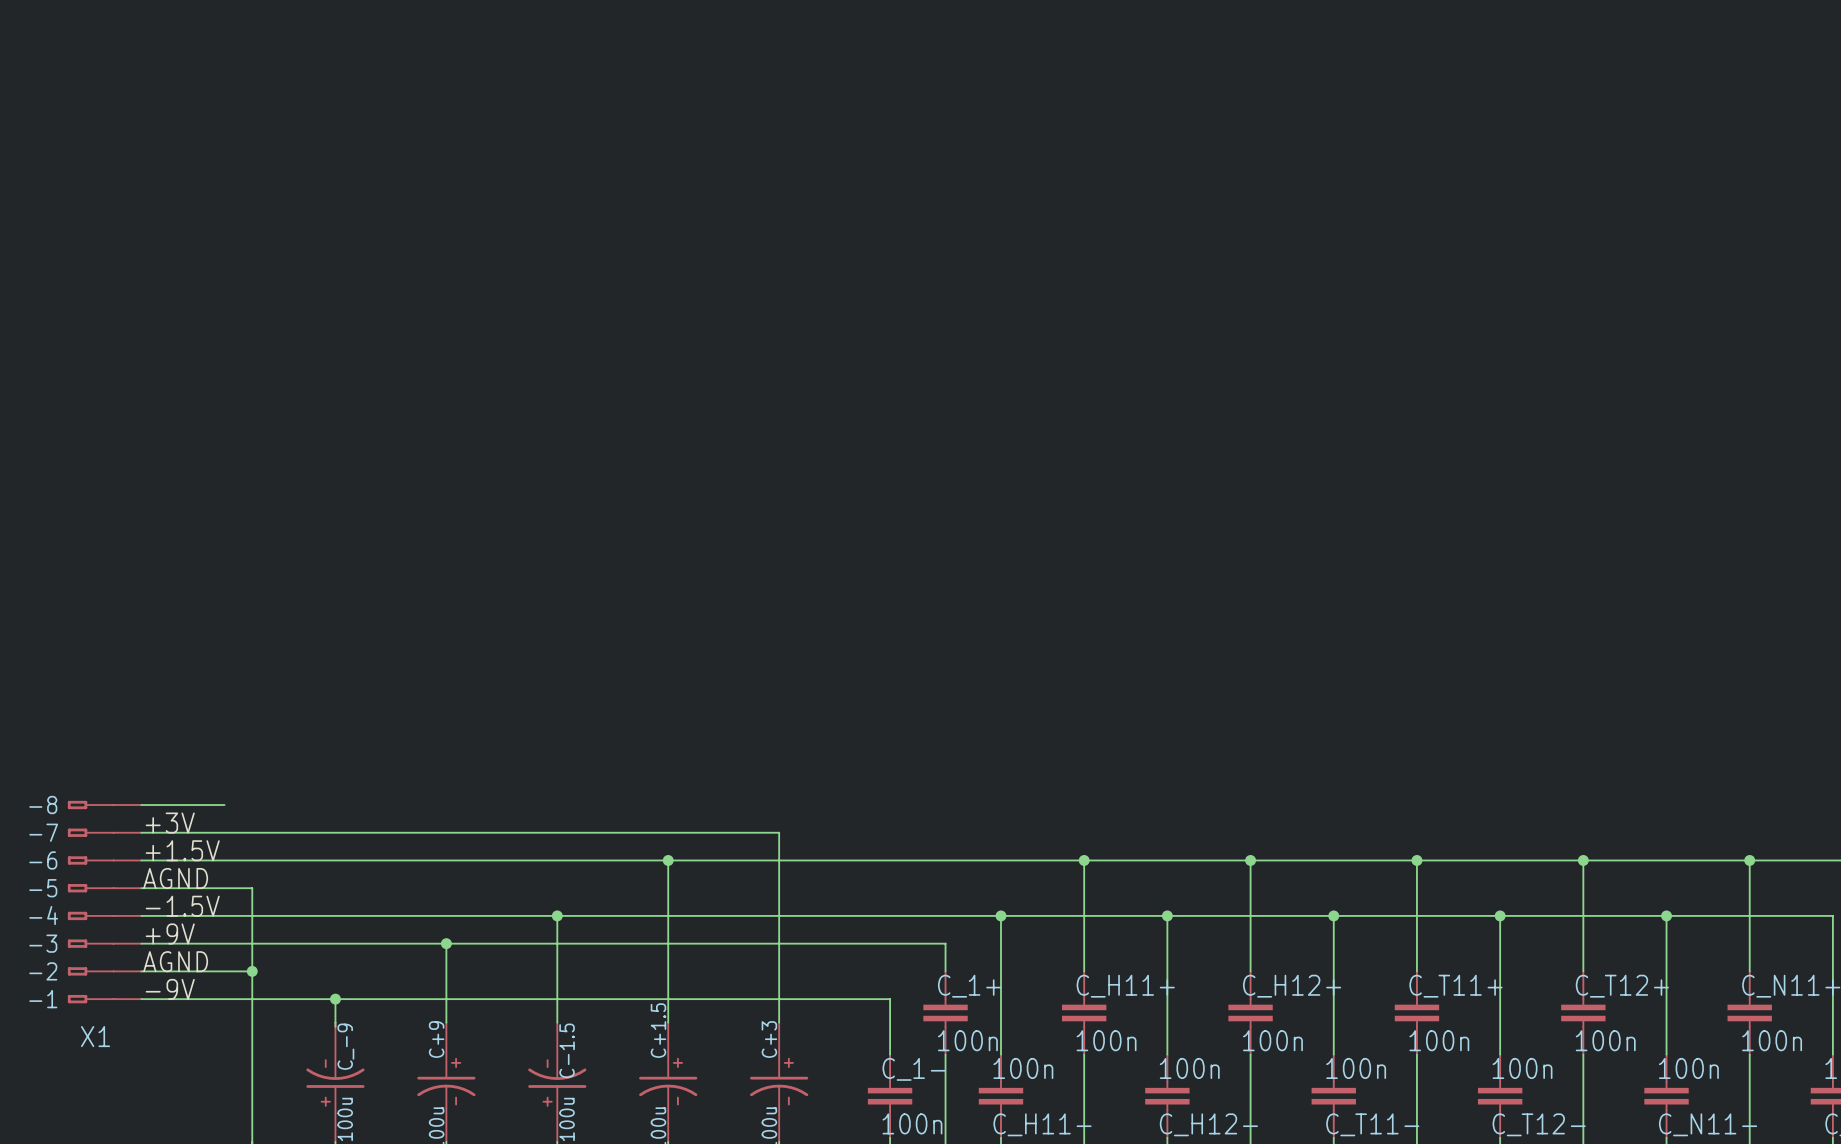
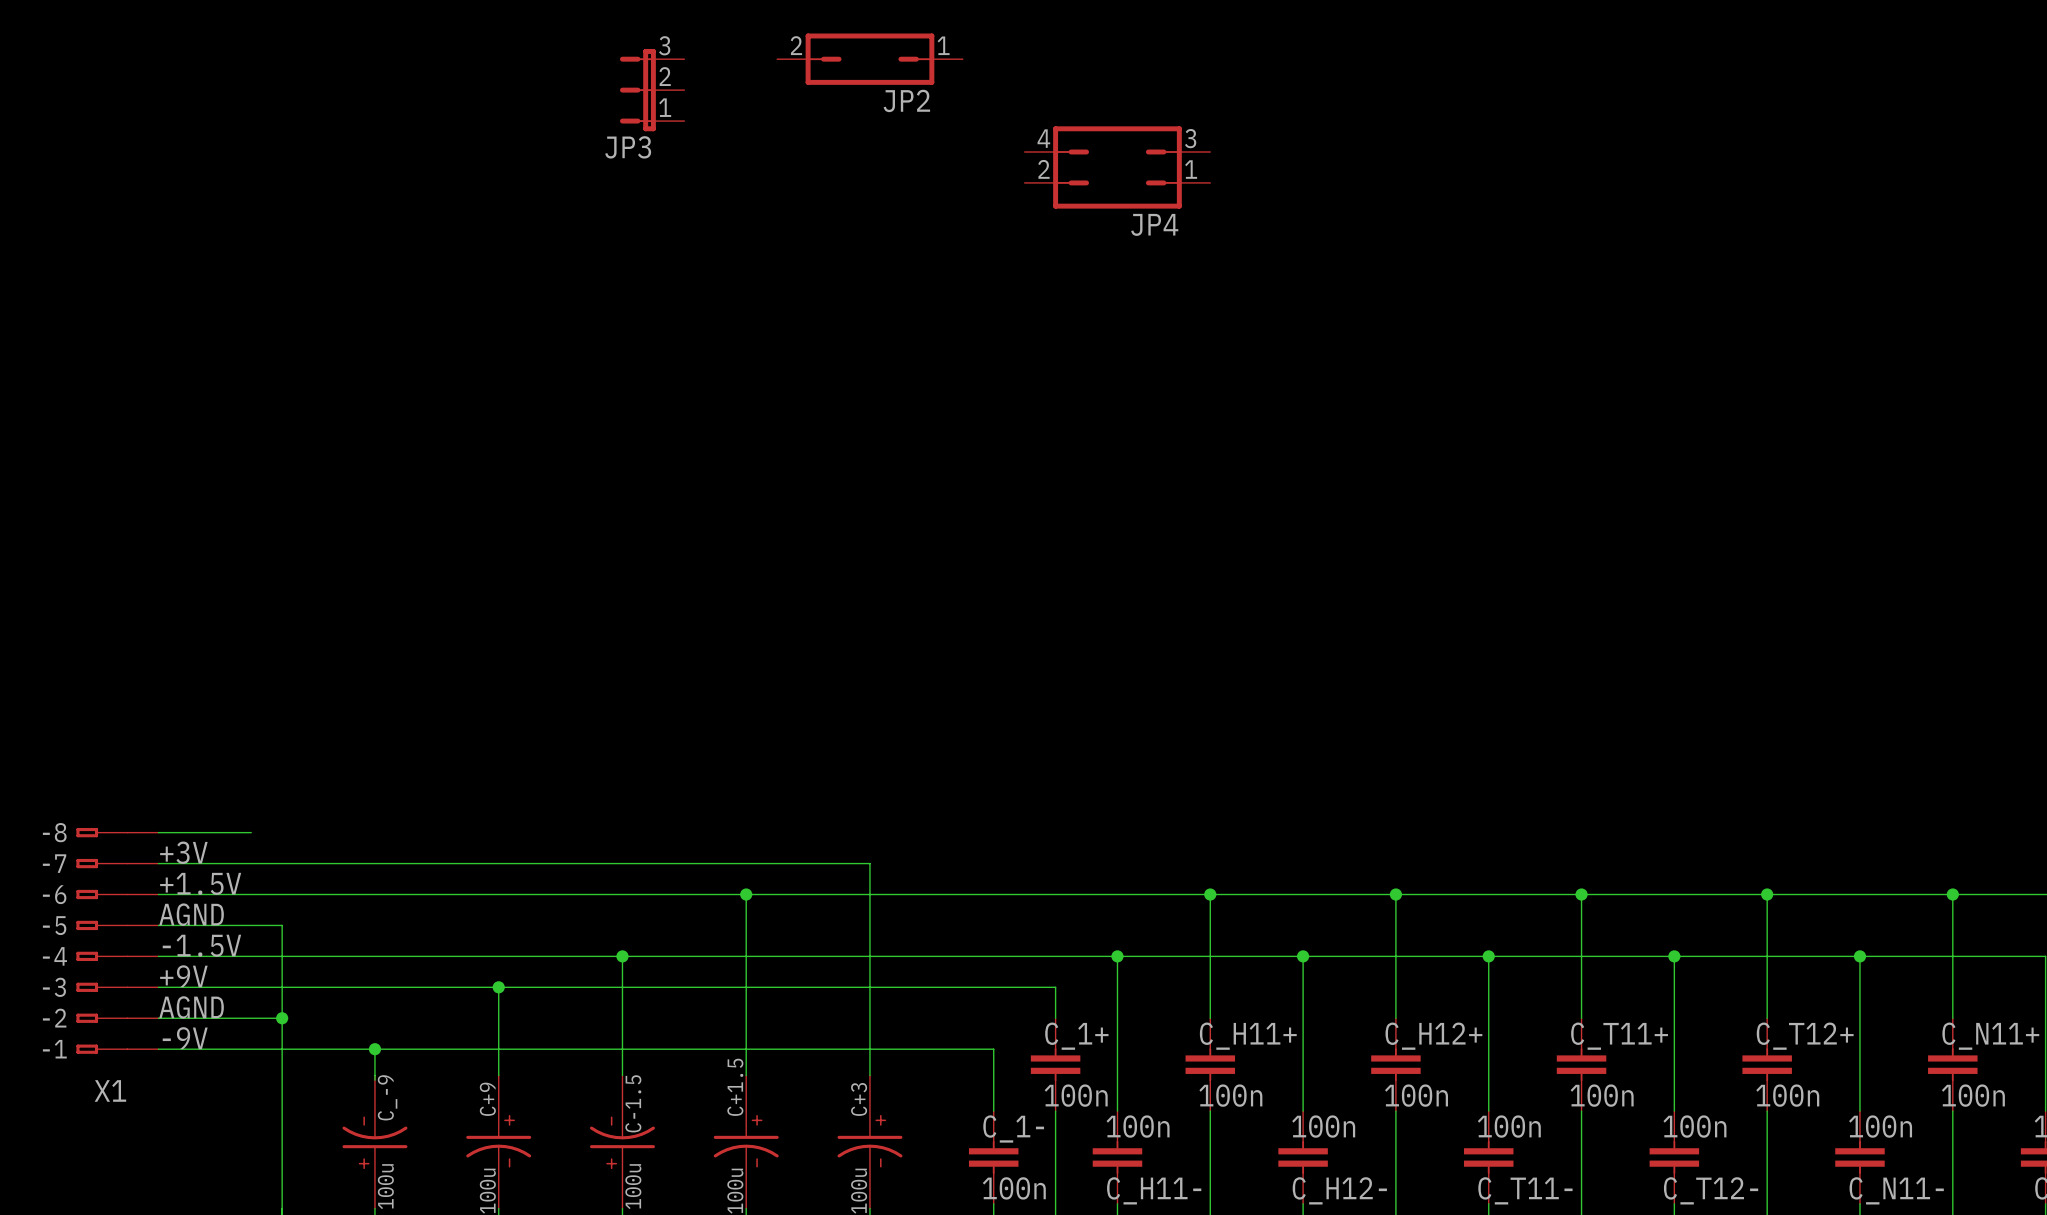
JP2: none -> (869, 59)
JP3: none -> (652, 90)
JP4: none -> (1117, 167)

